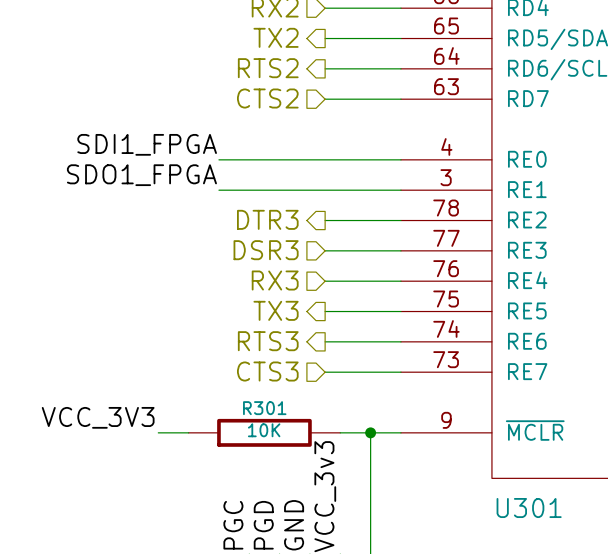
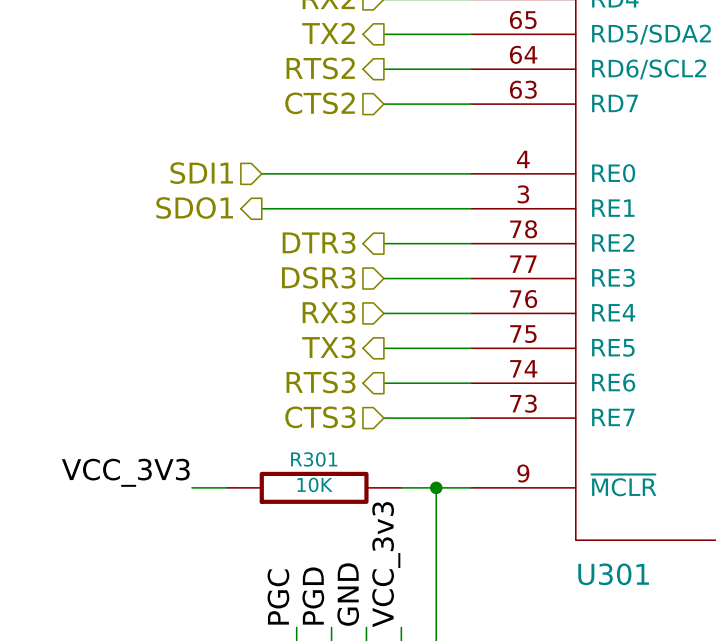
label: SDI1_FPGA (147, 144) -> none
hierarchical label: none -> SDI1 (201, 173)
label: SDO1_FPGA (141, 175) -> none
hierarchical label: none -> SDO1 (194, 208)

